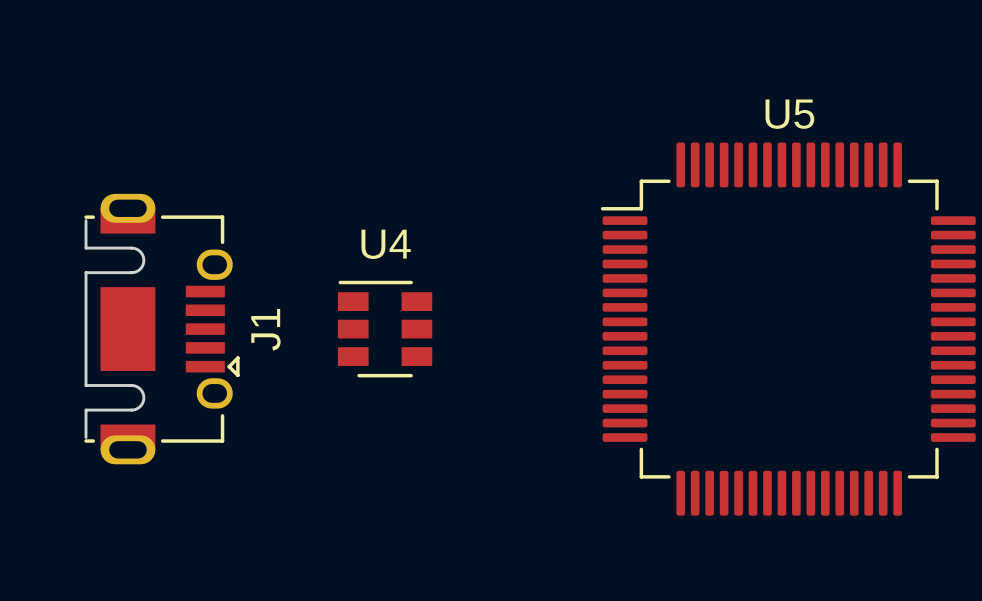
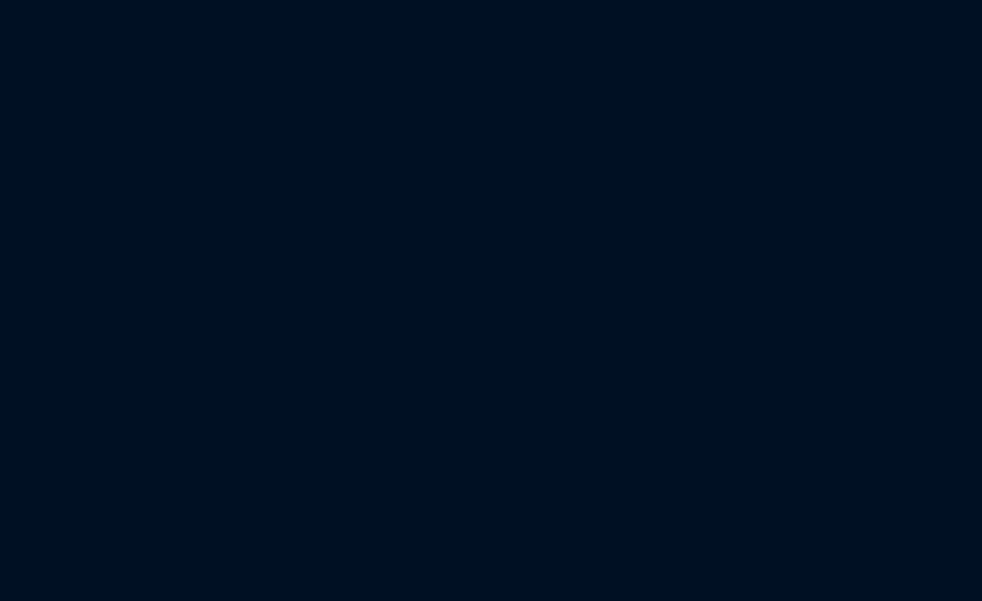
J1: (161, 329) -> none
U4: (385, 329) -> none
U5: (788, 329) -> none

